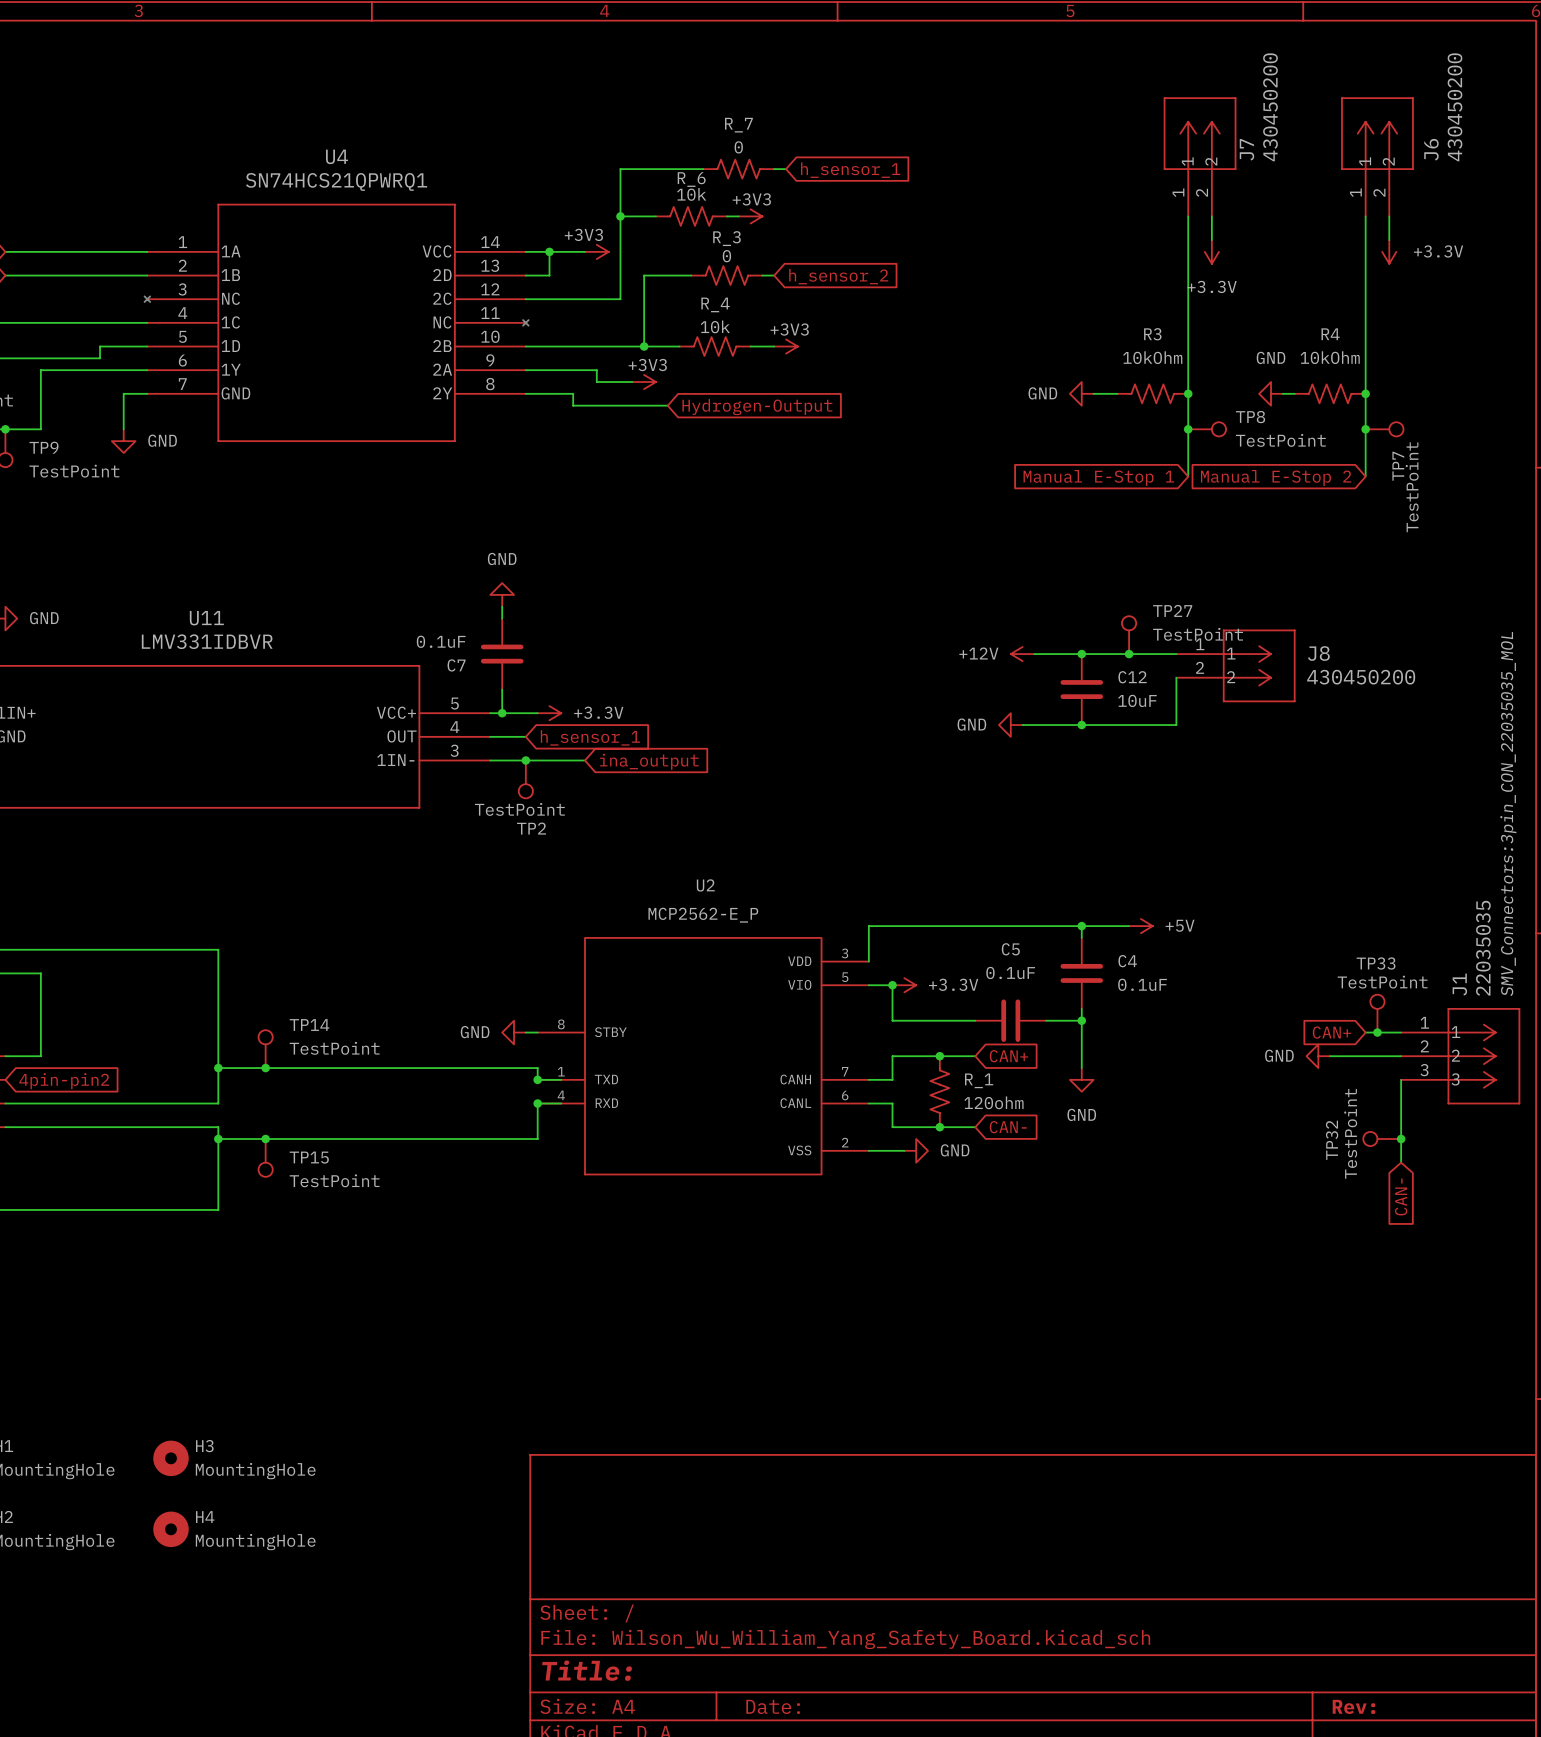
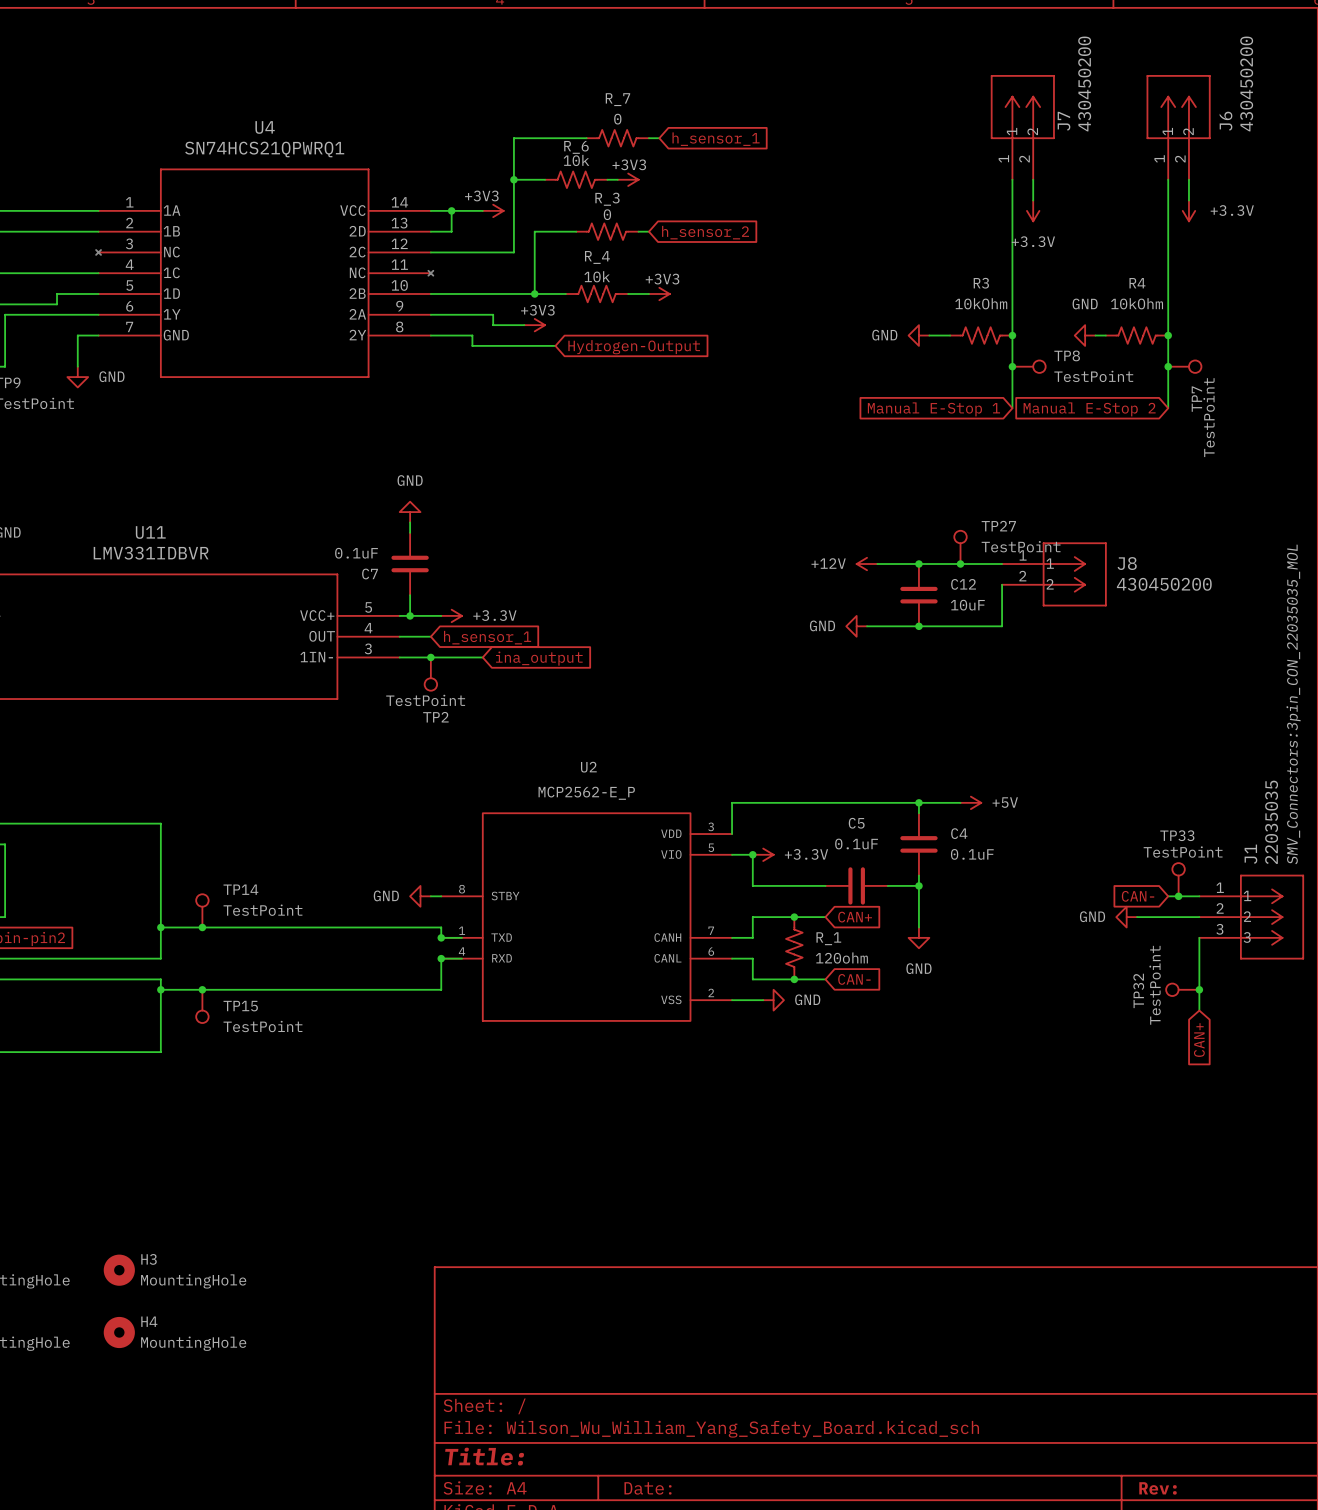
global label: CAN+ (1332, 1032) -> CAN- (1138, 896)
global label: CAN- (1401, 1197) -> CAN+ (1199, 1040)

